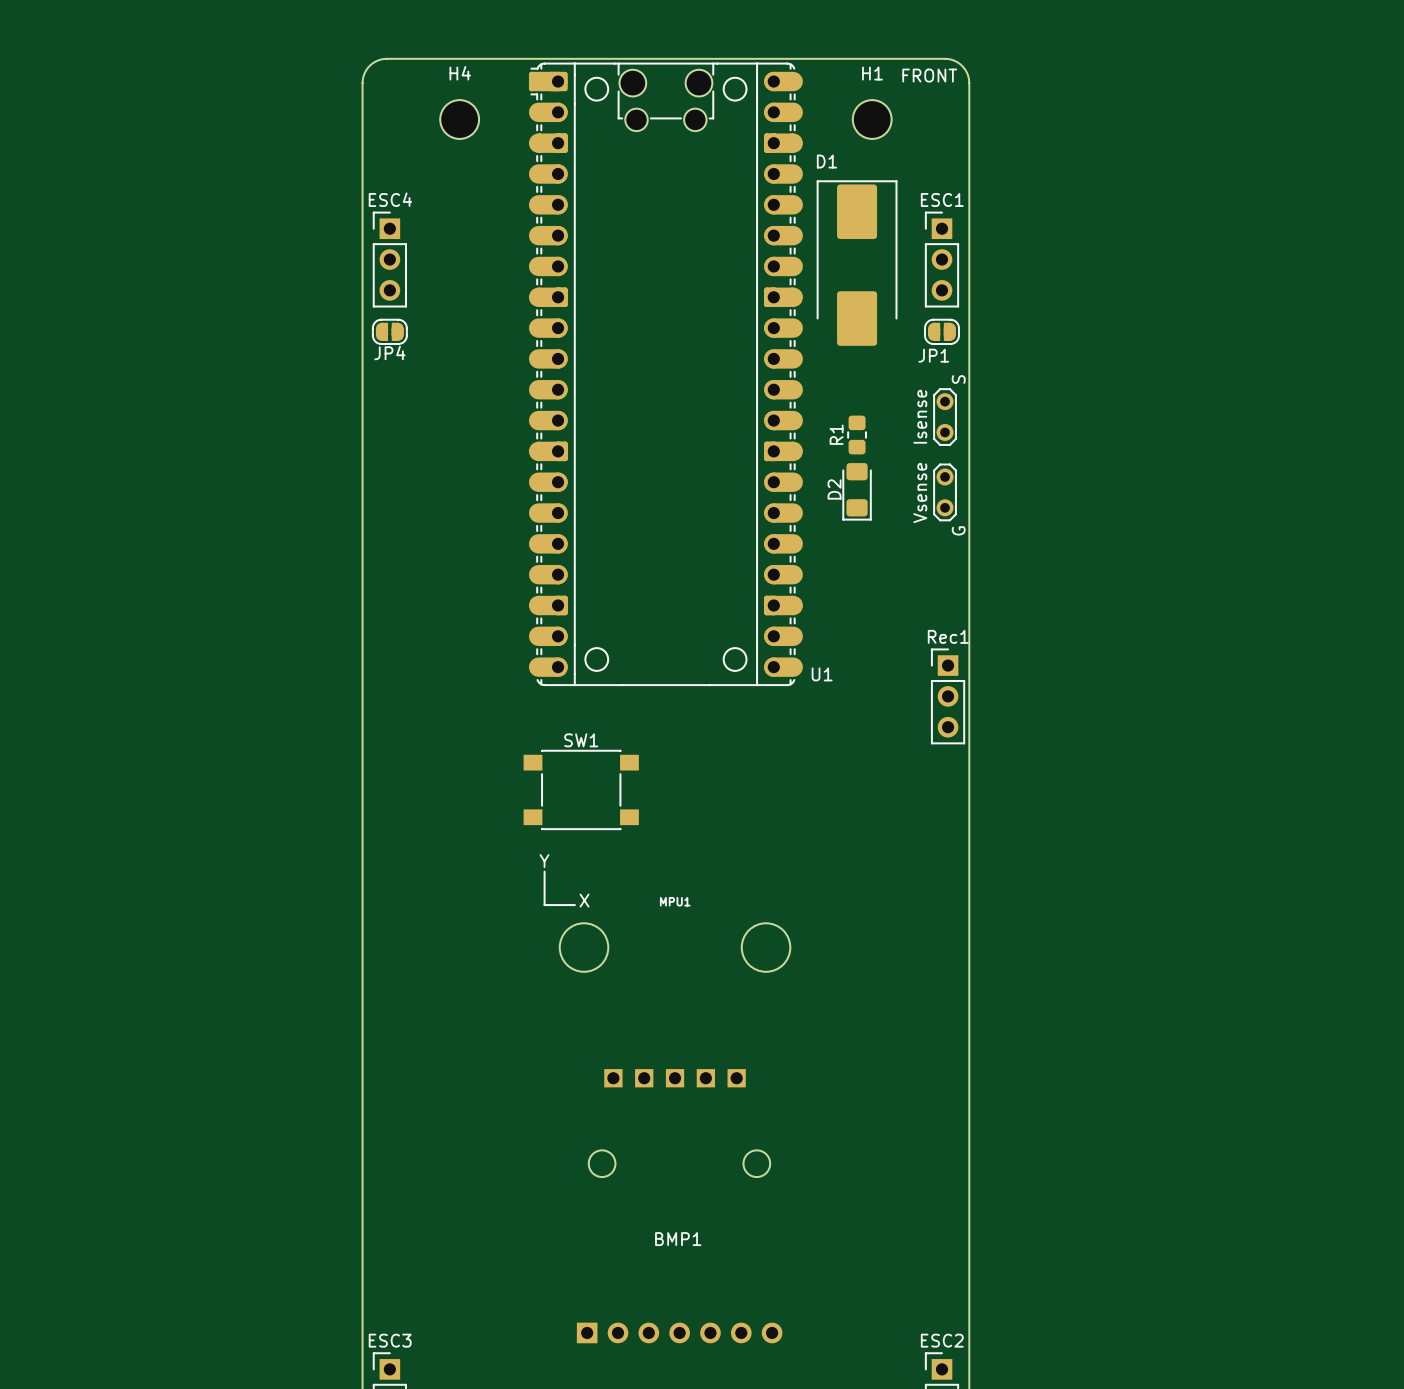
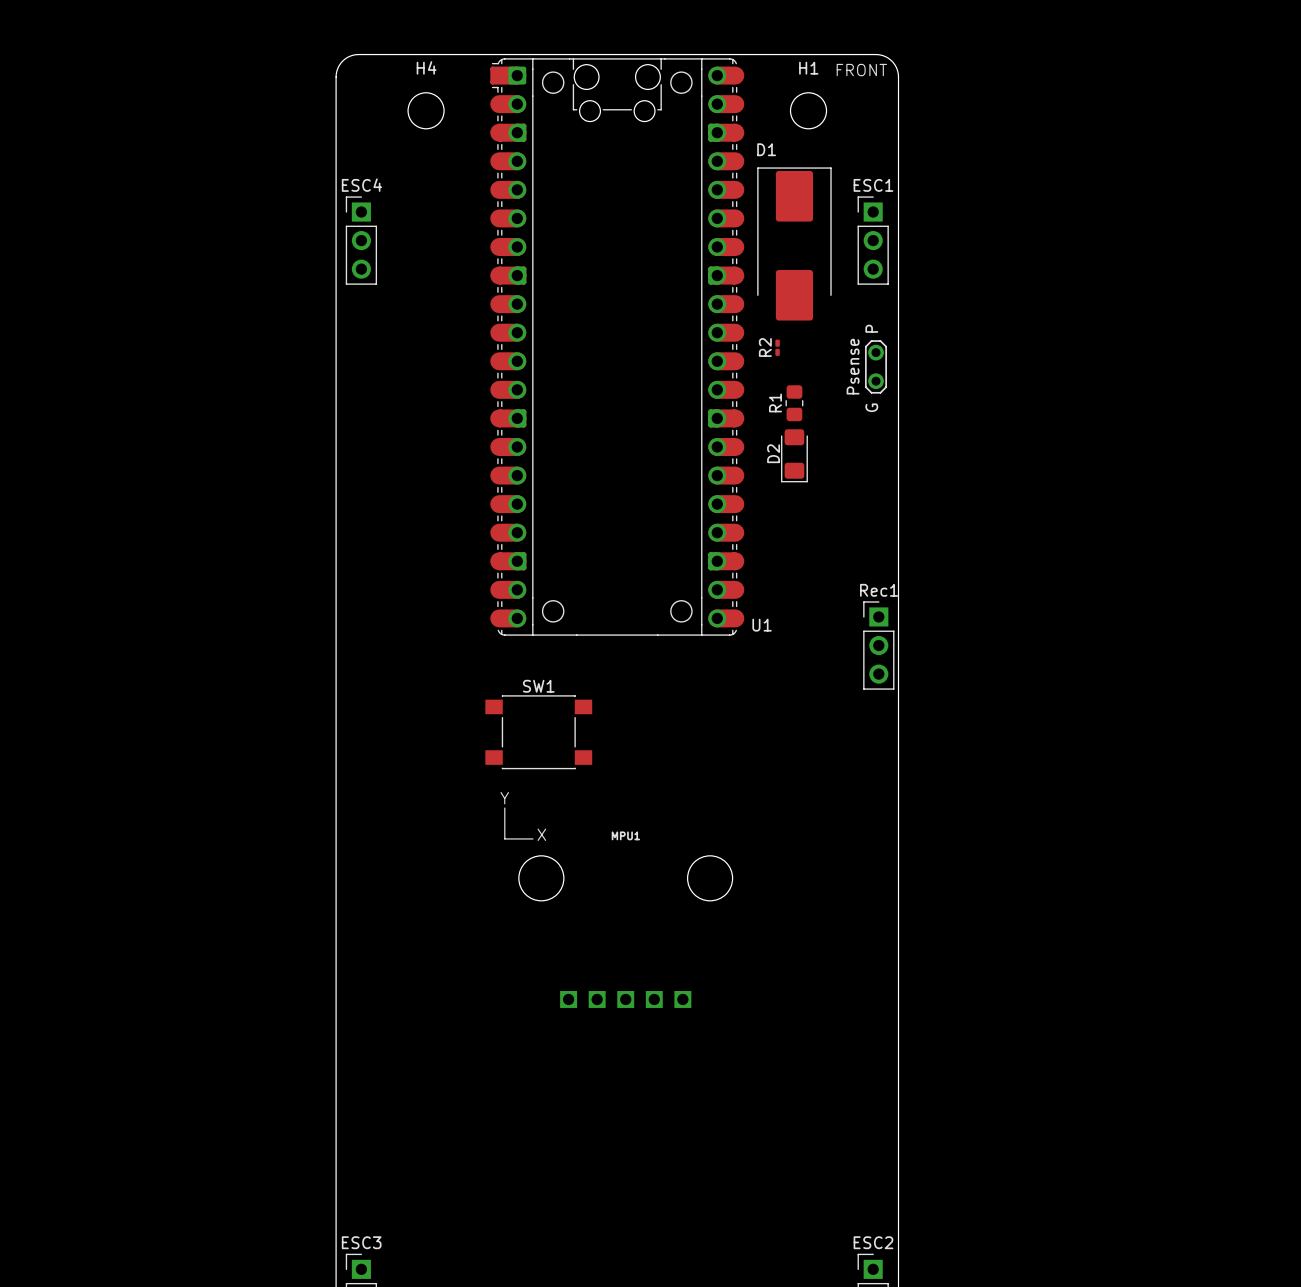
JP4: (389, 331) -> none
JP1: (941, 331) -> none
text: none -> P (871, 328)
R2: none -> (777, 347)
text: S (958, 379) -> none
part: none -> Psense (876, 366)
part: Isense (945, 417) -> none
part: Vsense (945, 492) -> none
text position: G (958, 530) -> G (871, 407)
BMP1: (679, 1246) -> none

